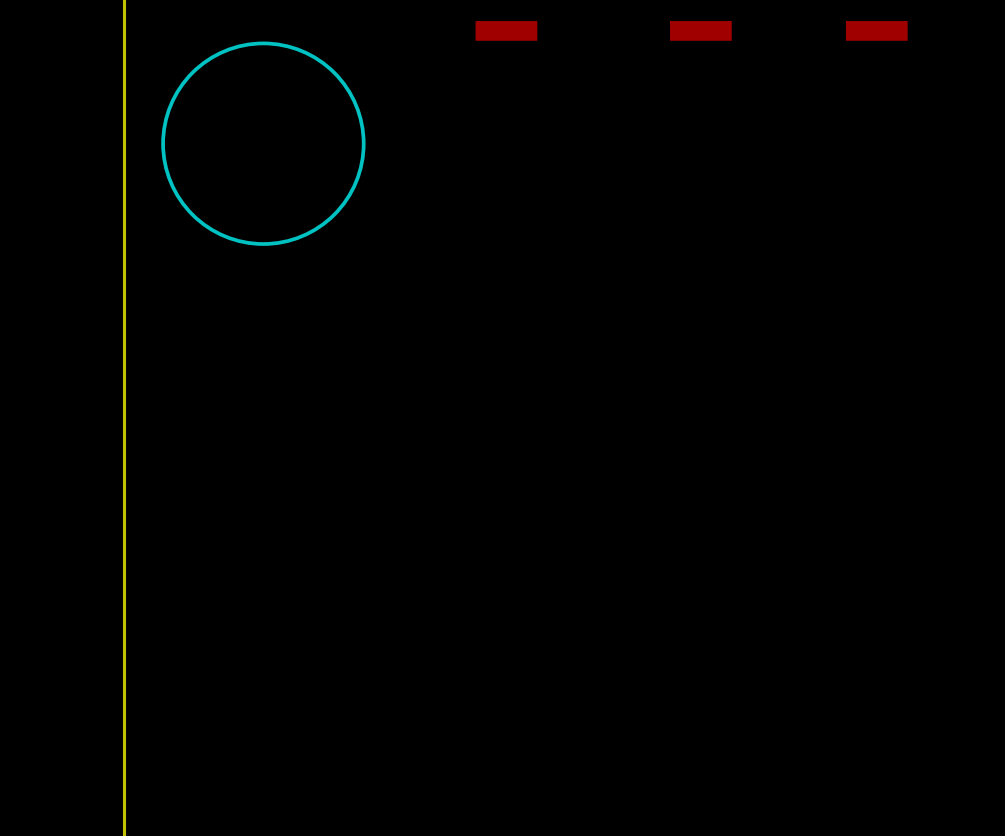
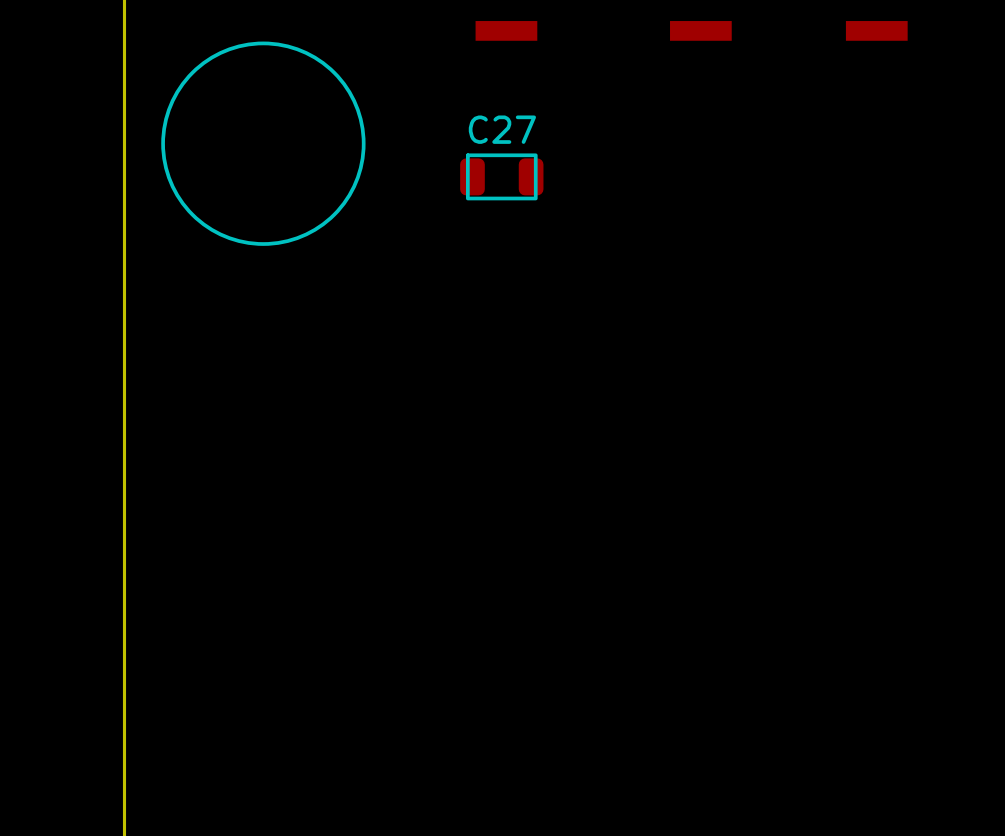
C27: none -> (501, 176)

